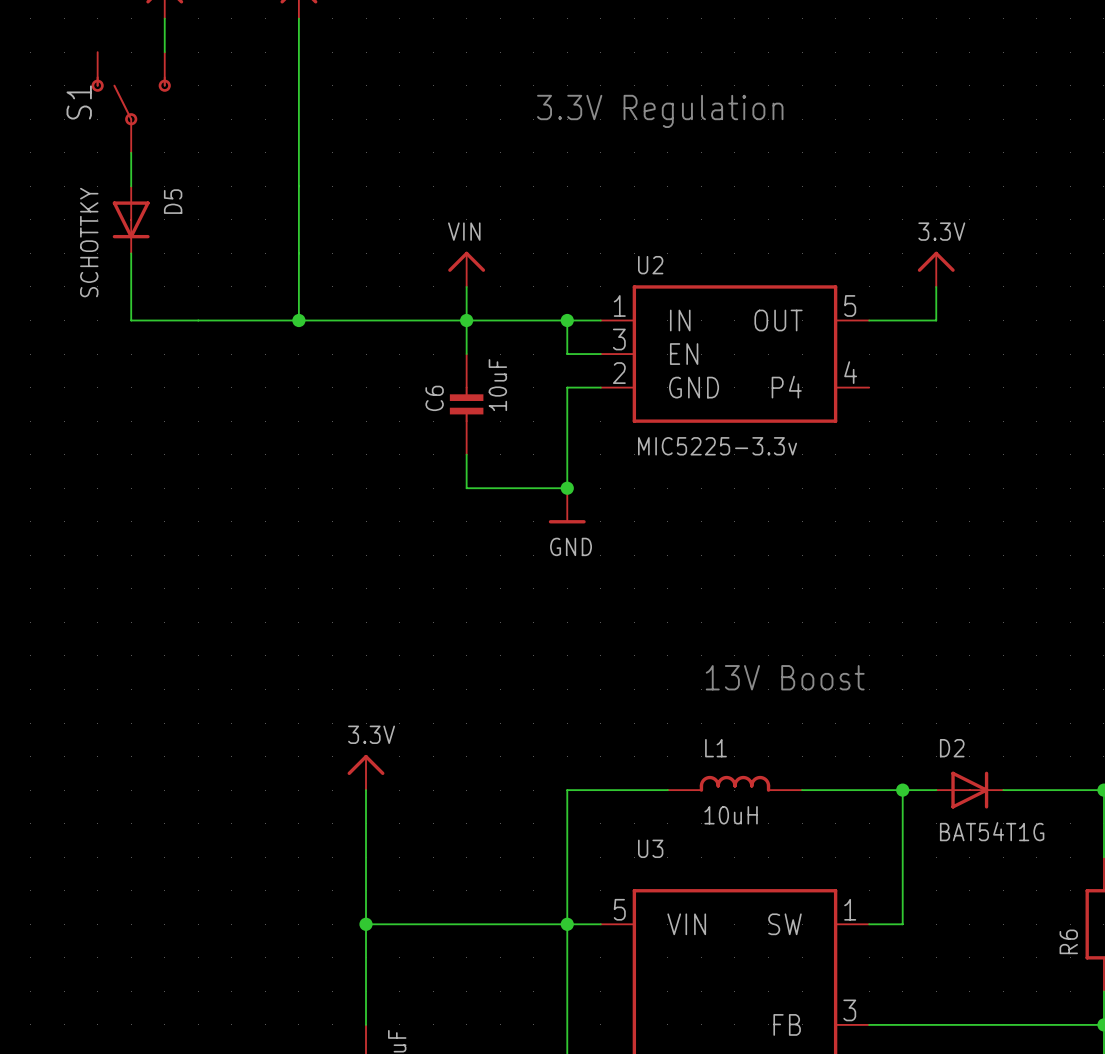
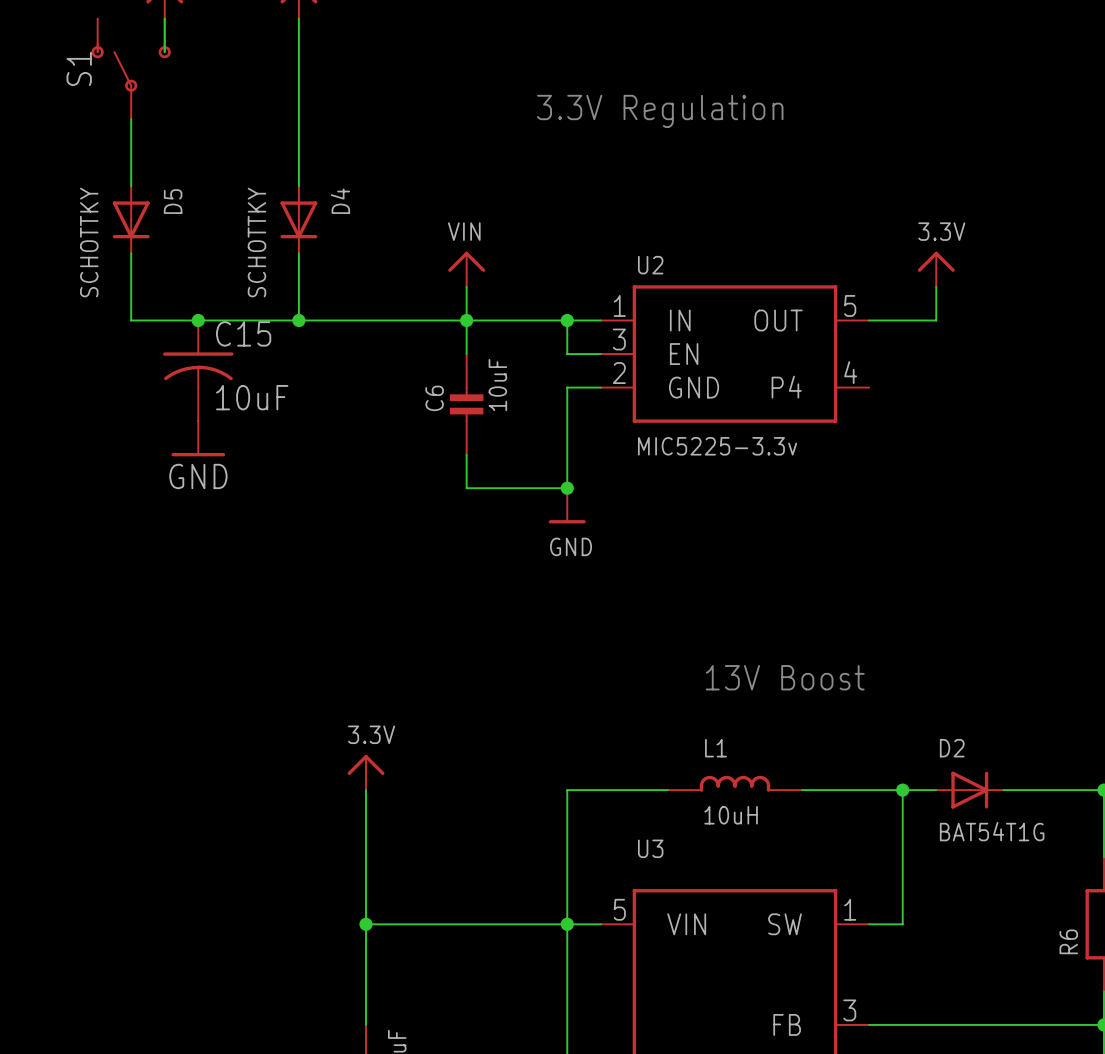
S1 position: (131, 102) -> (131, 68)
D4: none -> SCHOTTKY (298, 219)
junction: none -> (198, 320)
C15: none -> 10uF (198, 370)
power symbol: none -> GND (198, 438)

